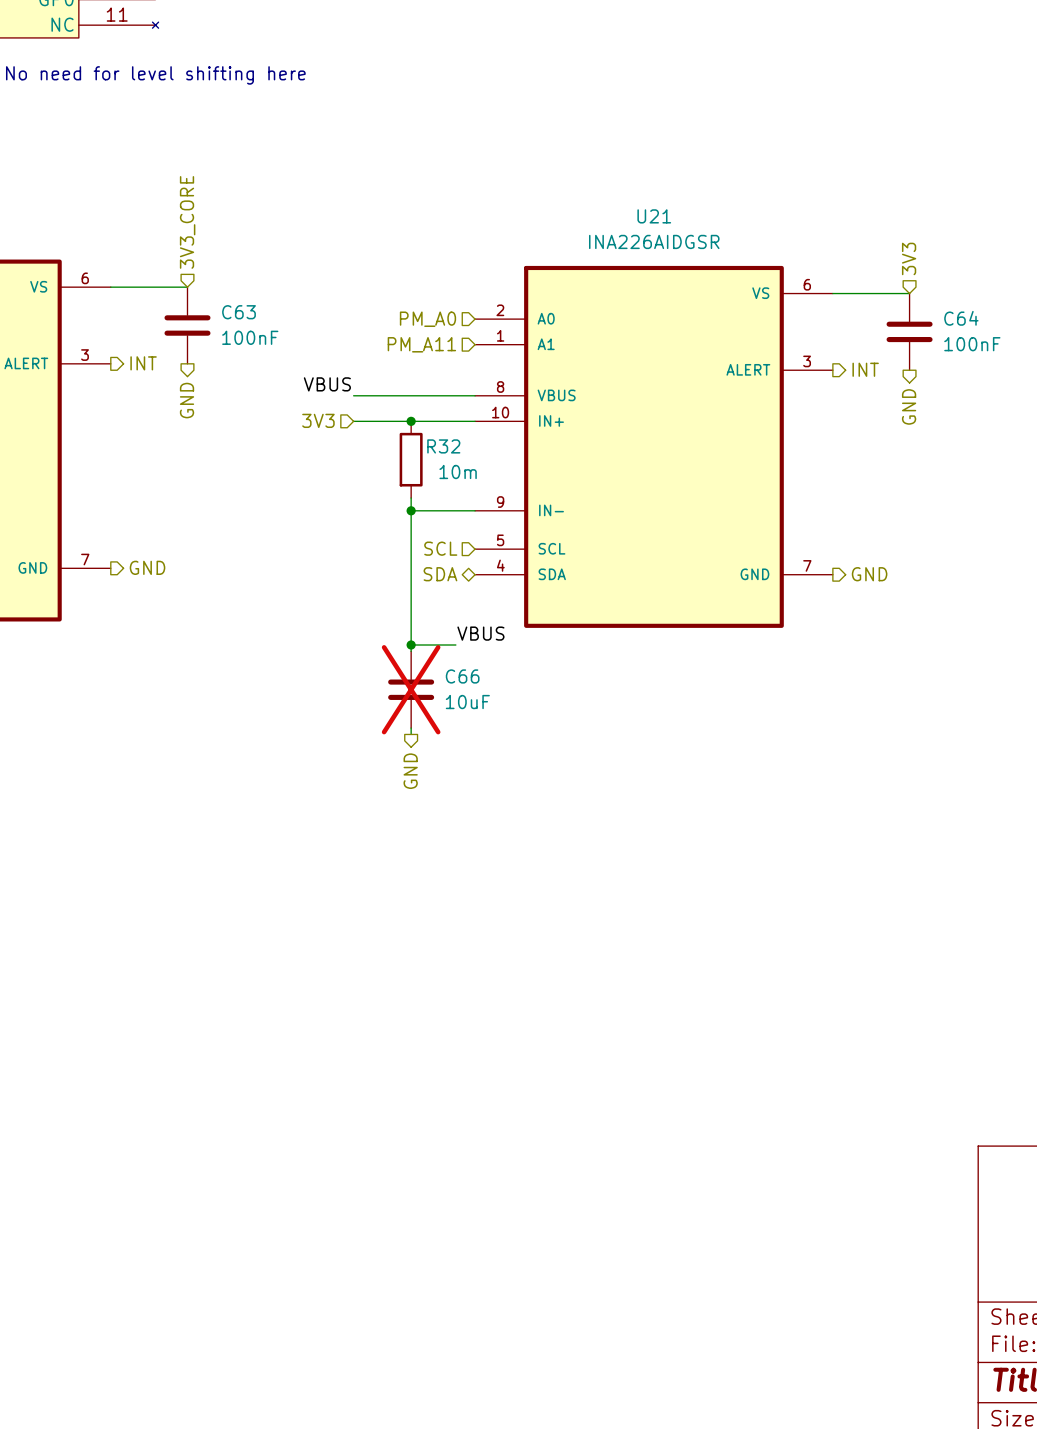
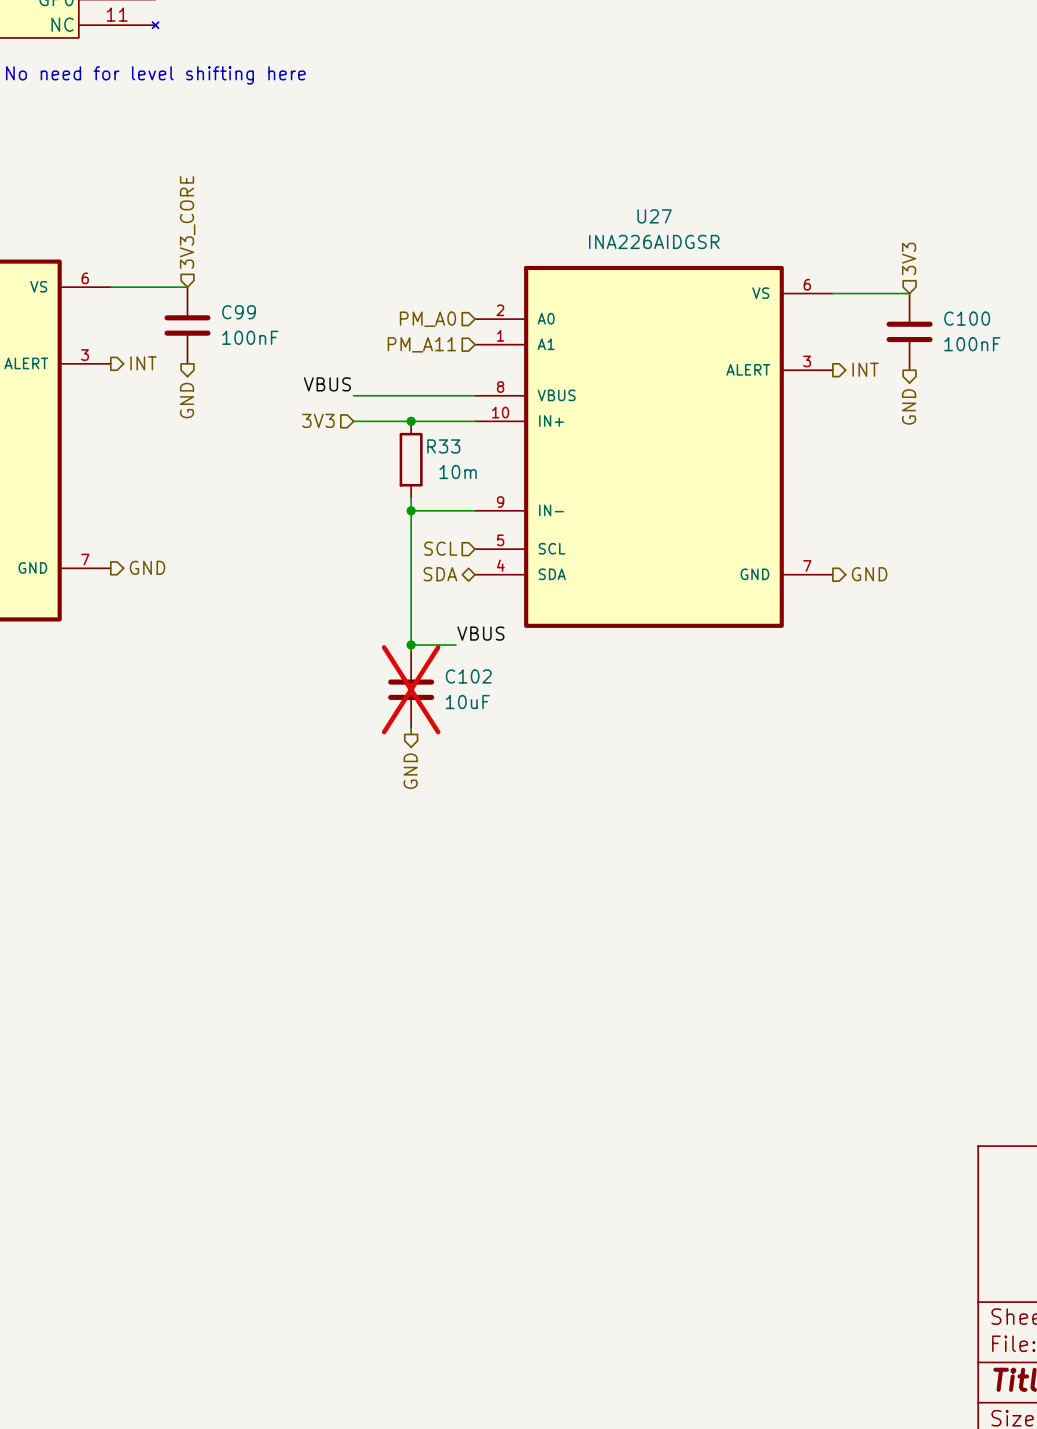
U21 name: U21 (654, 216) -> U27 (654, 216)
C63 name: C63 (239, 312) -> C99 (239, 312)
C64 name: C64 (961, 318) -> C100 (967, 318)
R32 name: R32 (443, 446) -> R33 (443, 446)
C66 name: C66 (462, 676) -> C102 (468, 676)

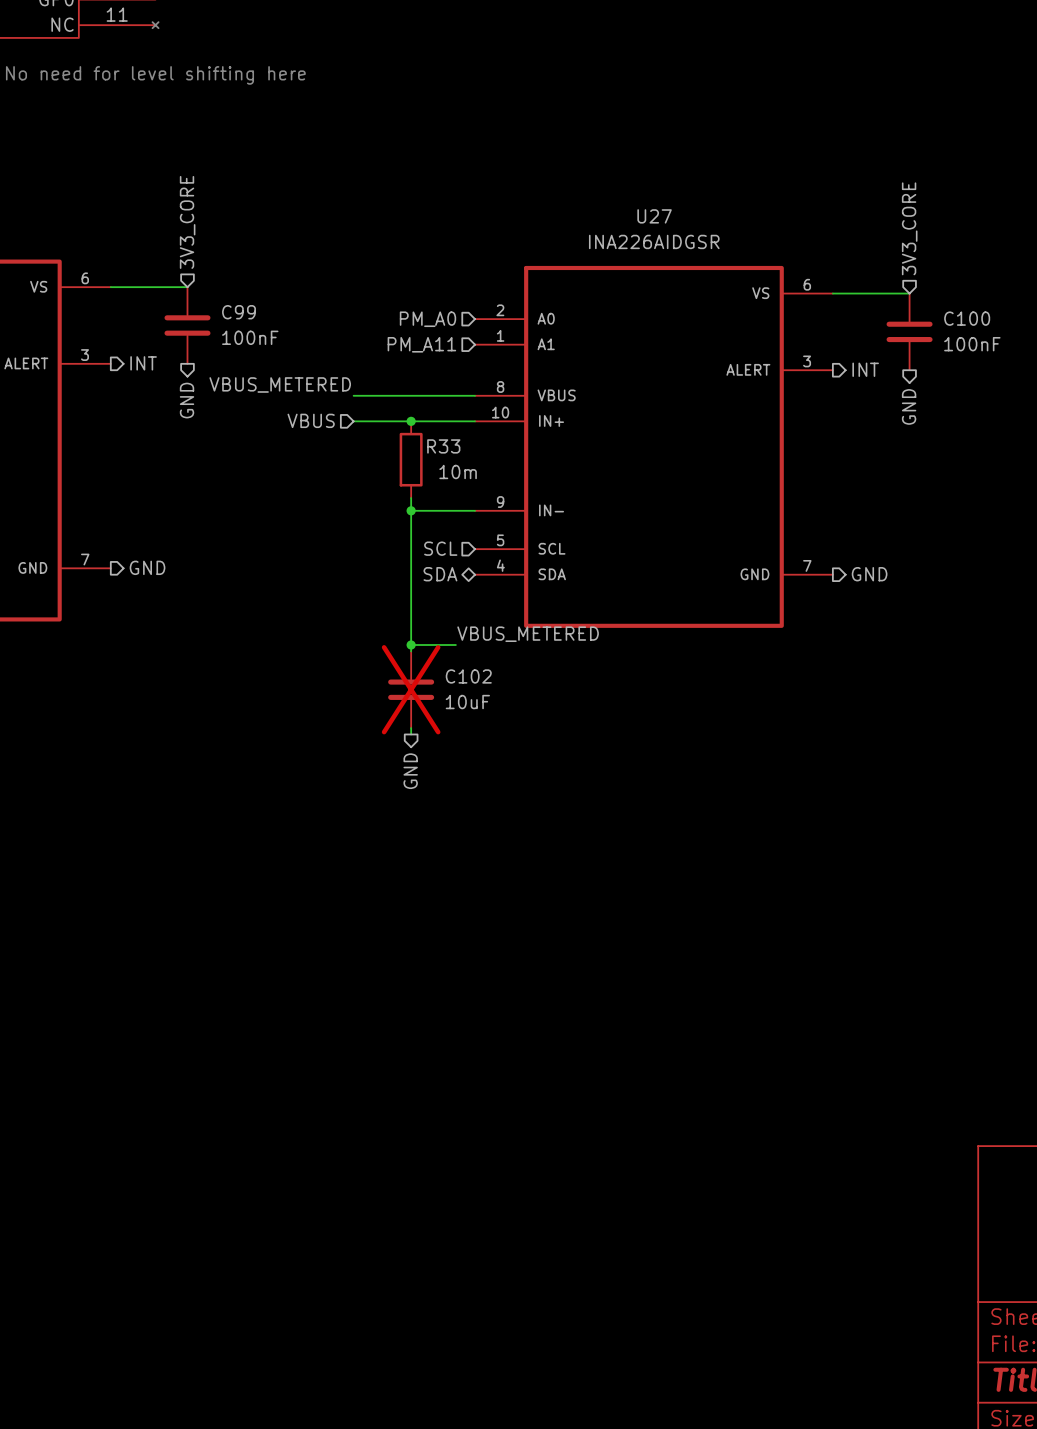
hierarchical label: 3V3 (909, 258) -> 3V3_CORE (909, 228)
label: VBUS (327, 384) -> VBUS_METERED (280, 384)
hierarchical label: 3V3 (318, 420) -> VBUS (311, 420)
label: VBUS (480, 633) -> VBUS_METERED (528, 634)

